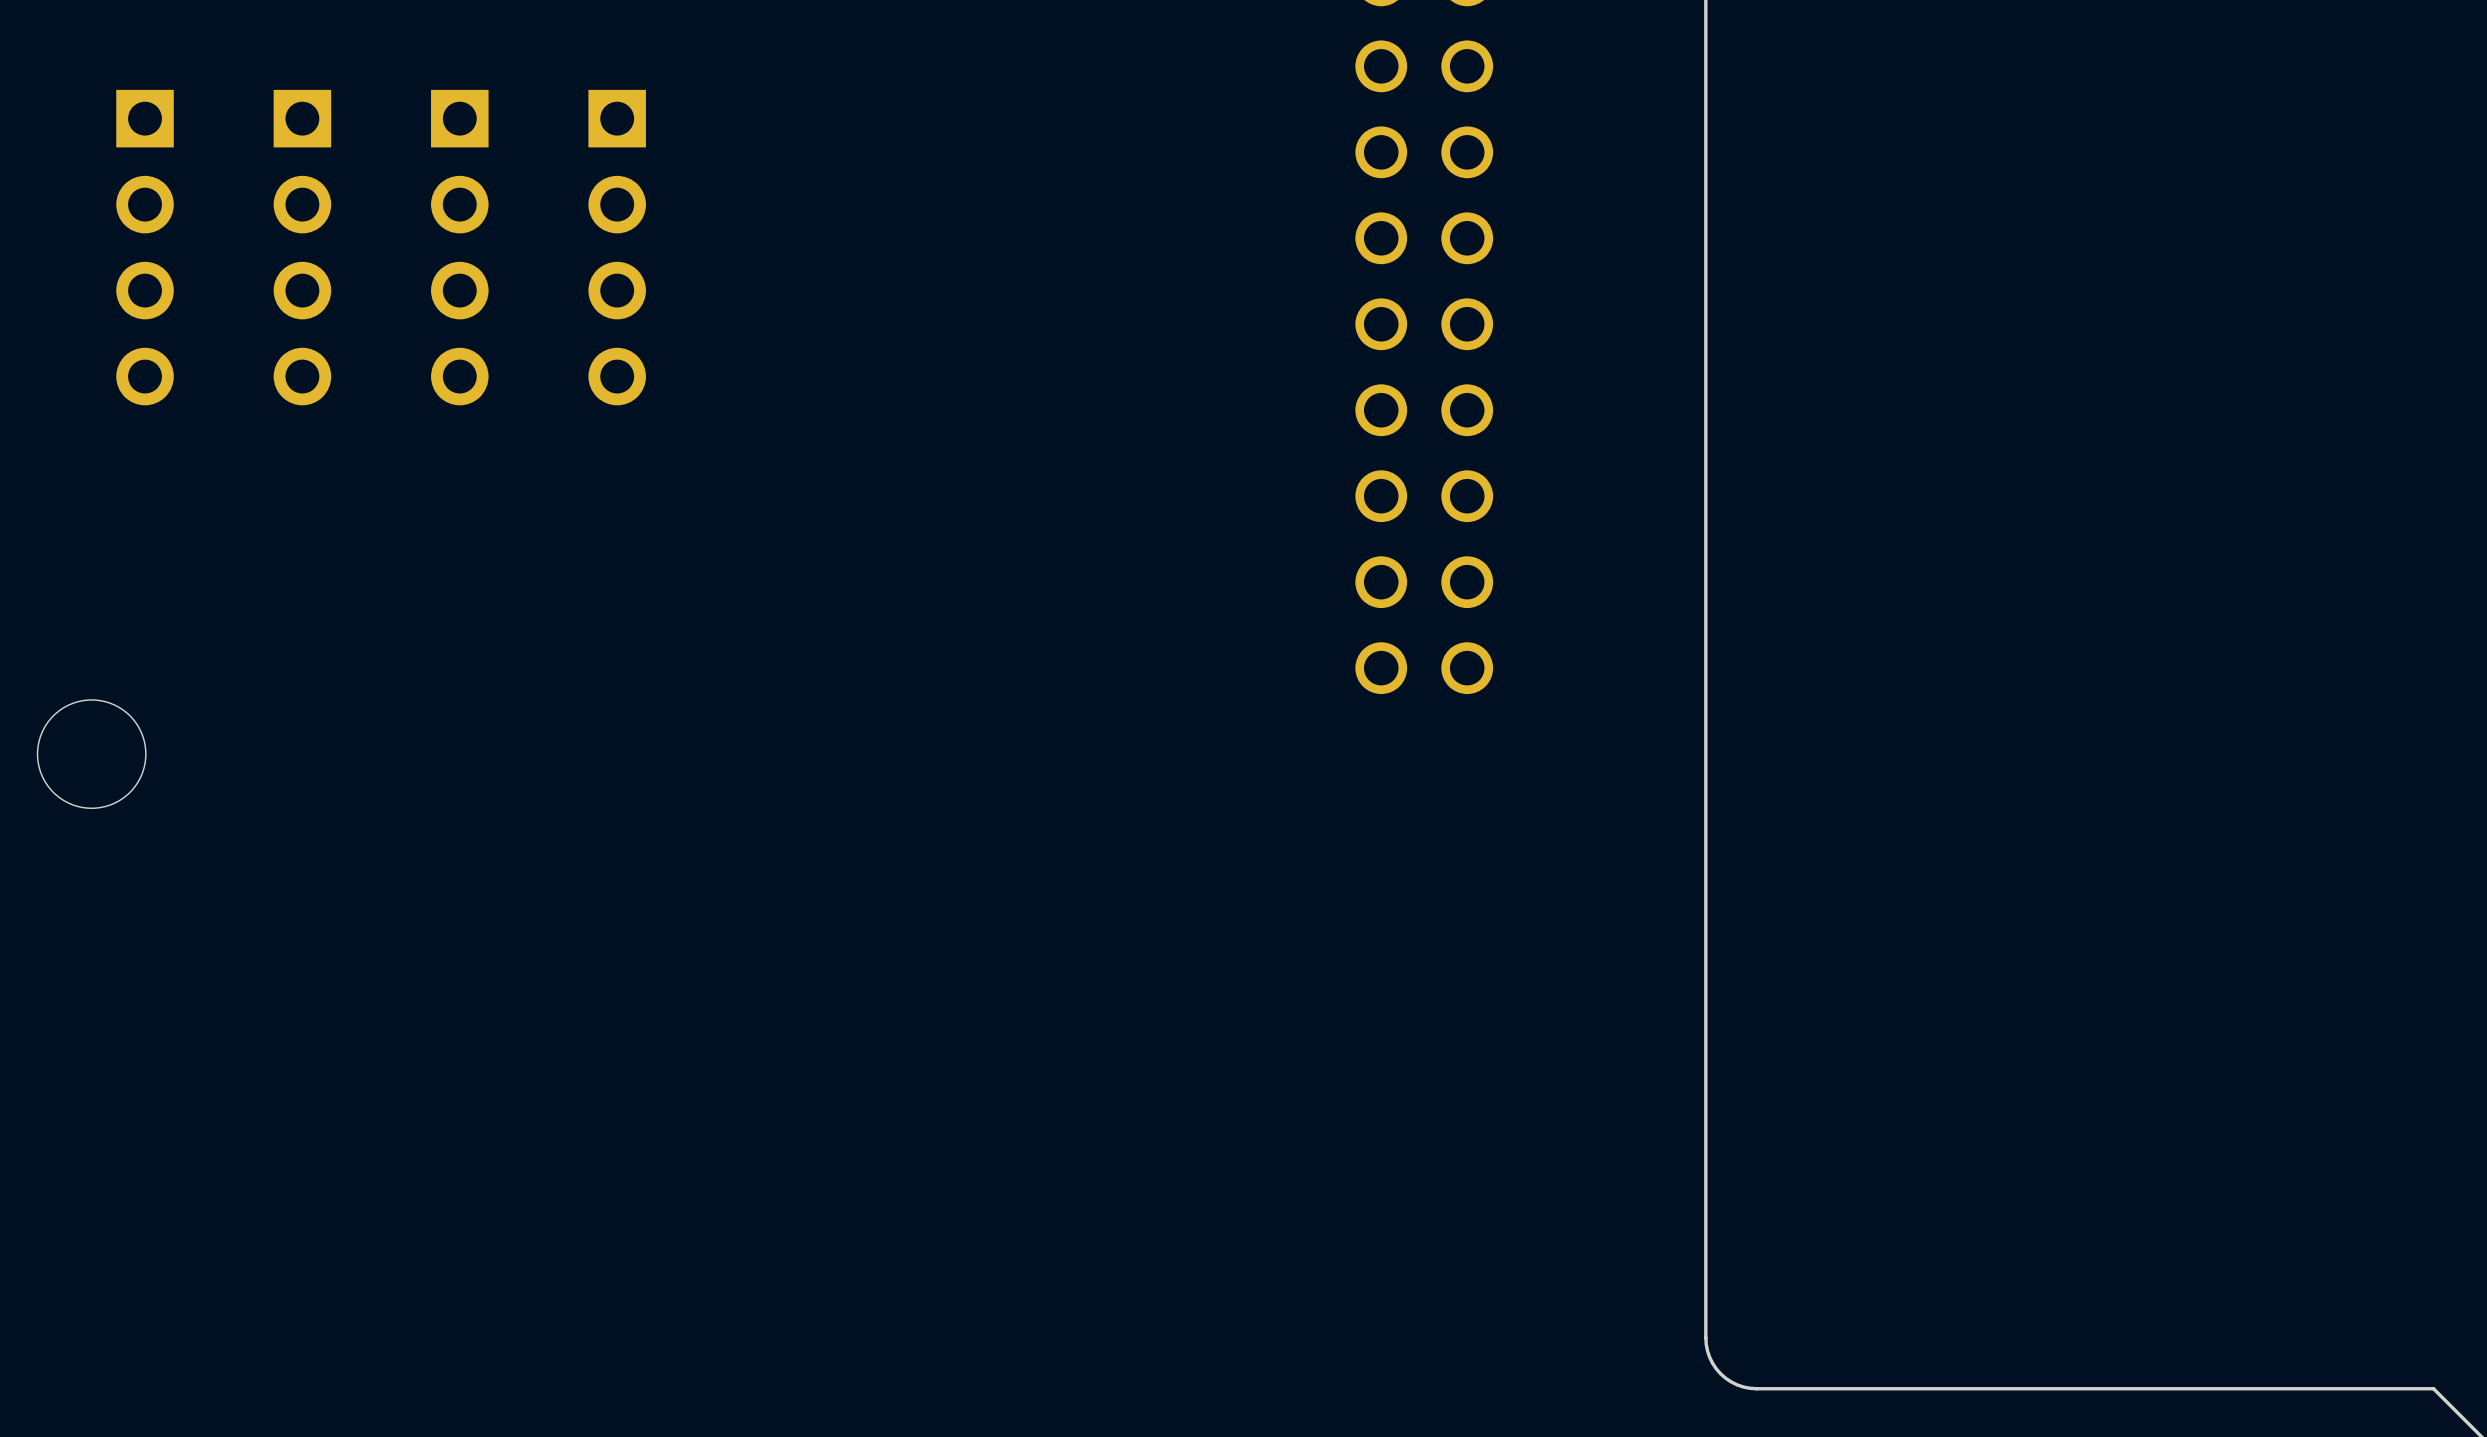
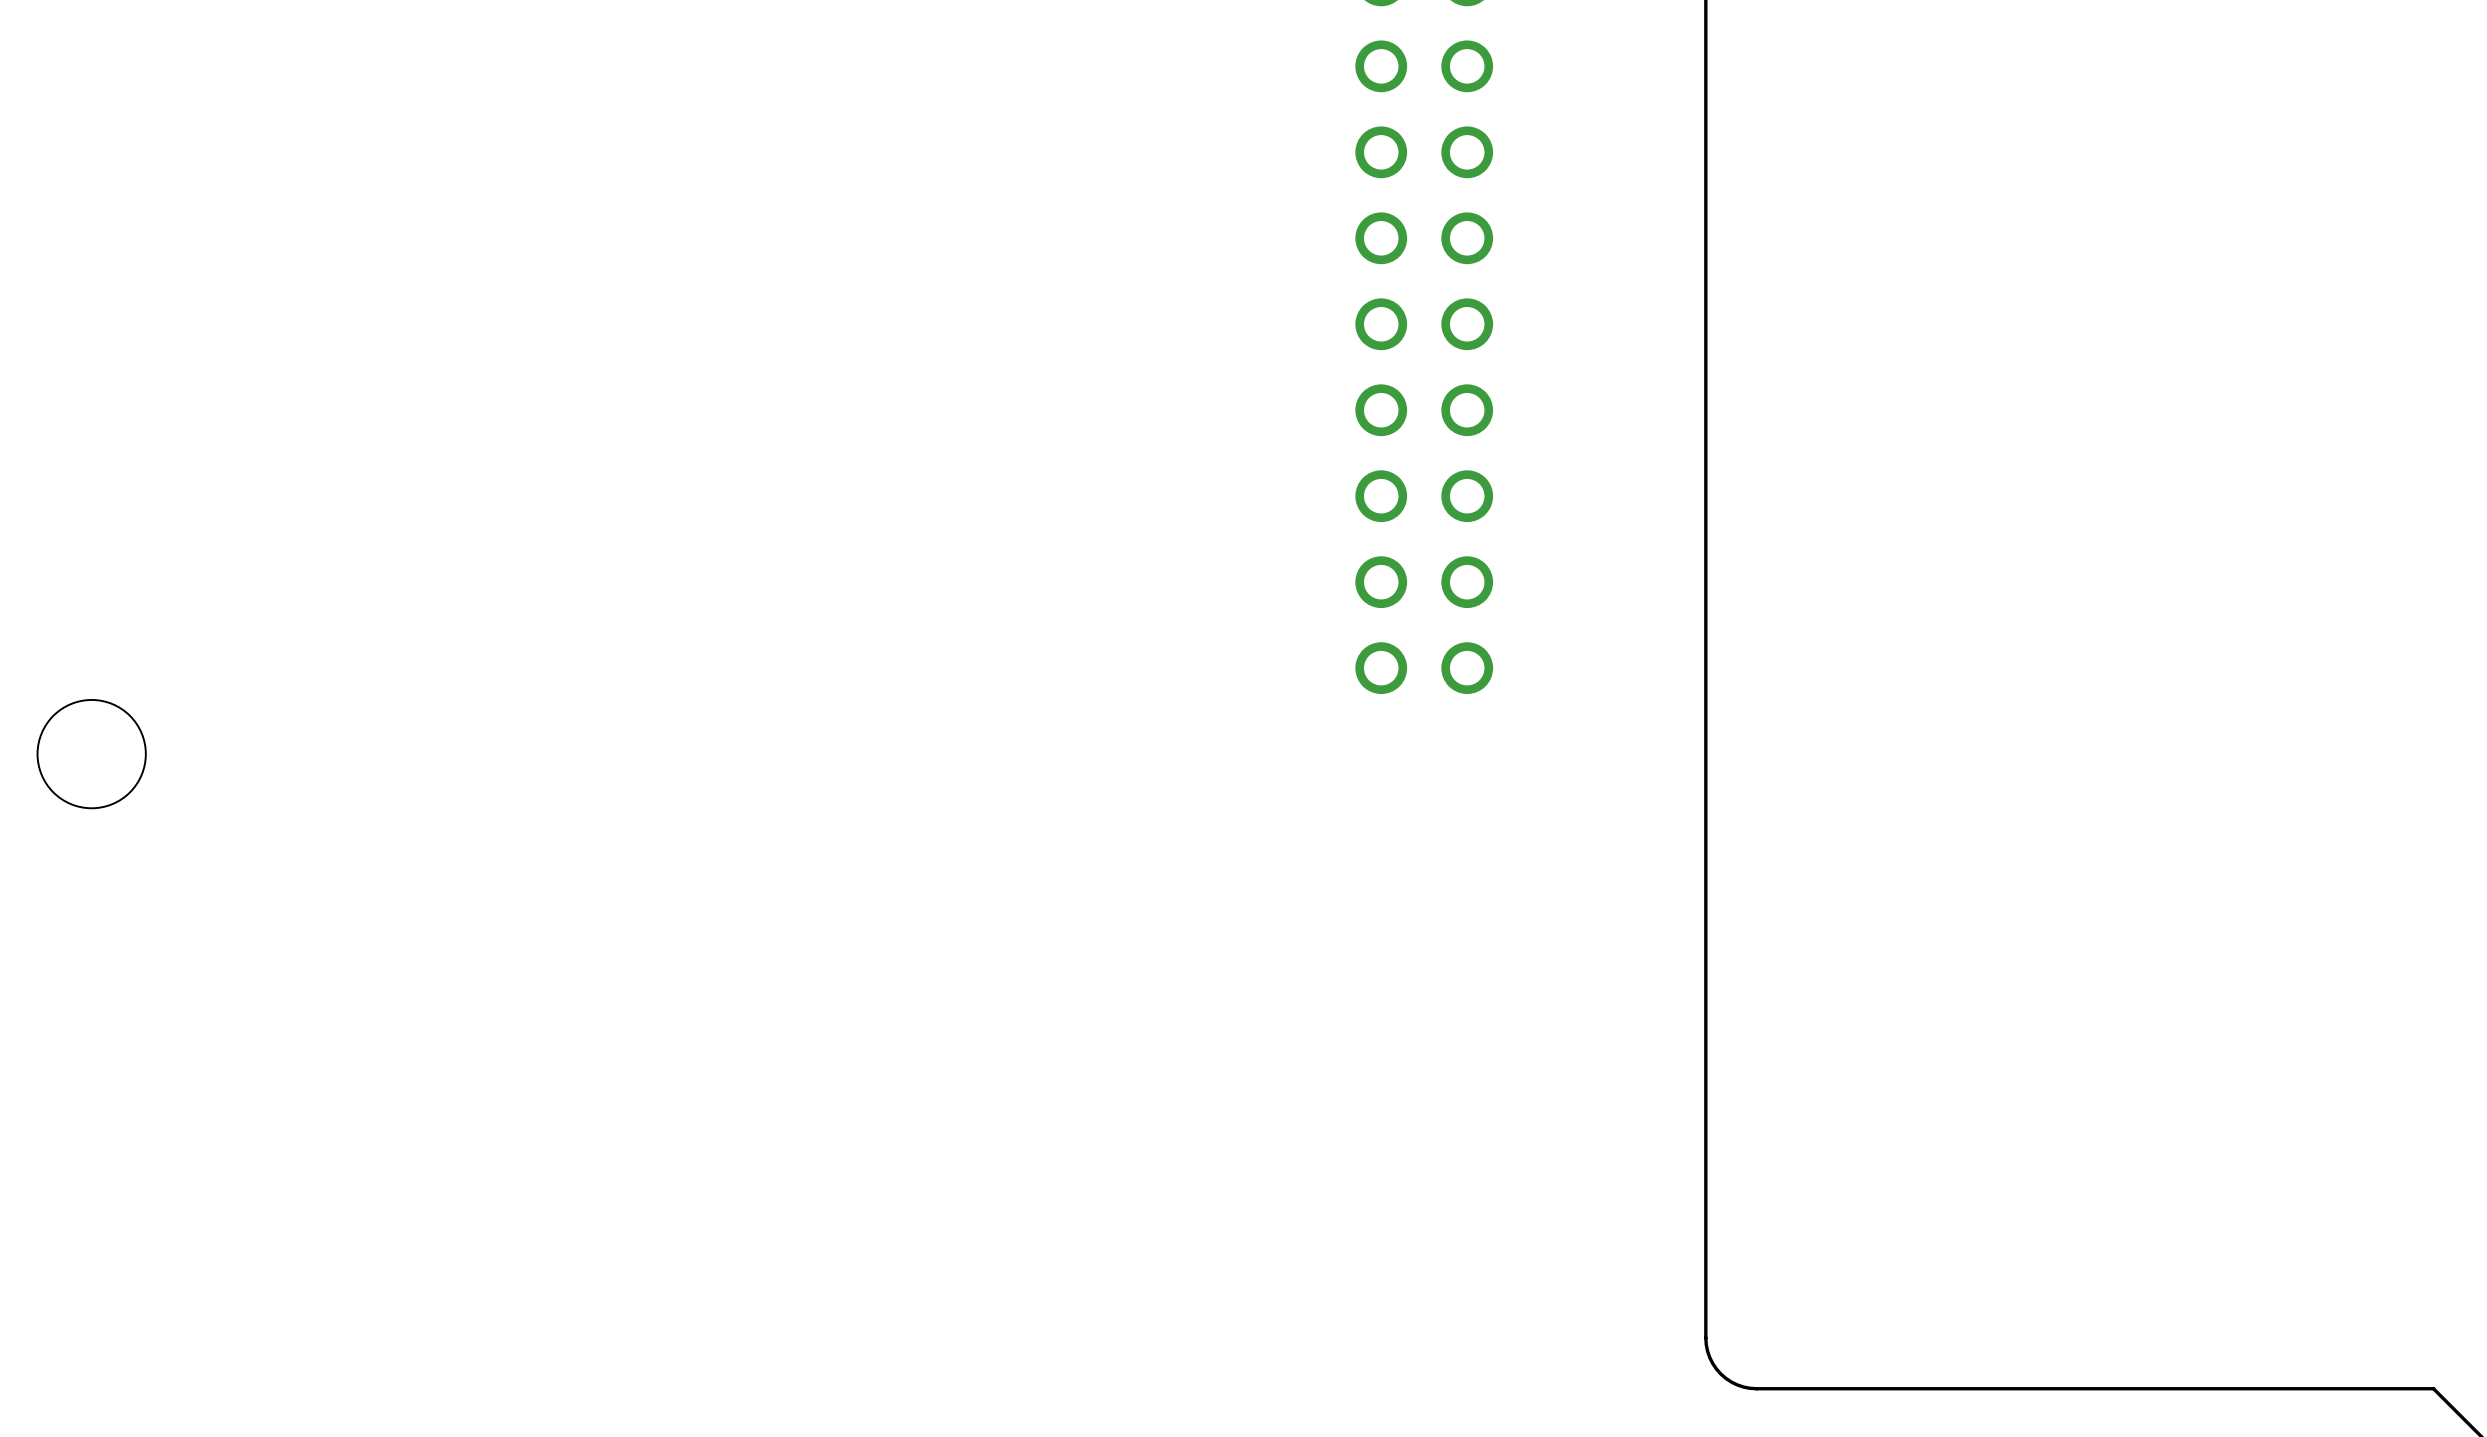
part: (145, 247) -> none
part: (302, 247) -> none
part: (459, 247) -> none
part: (617, 247) -> none

